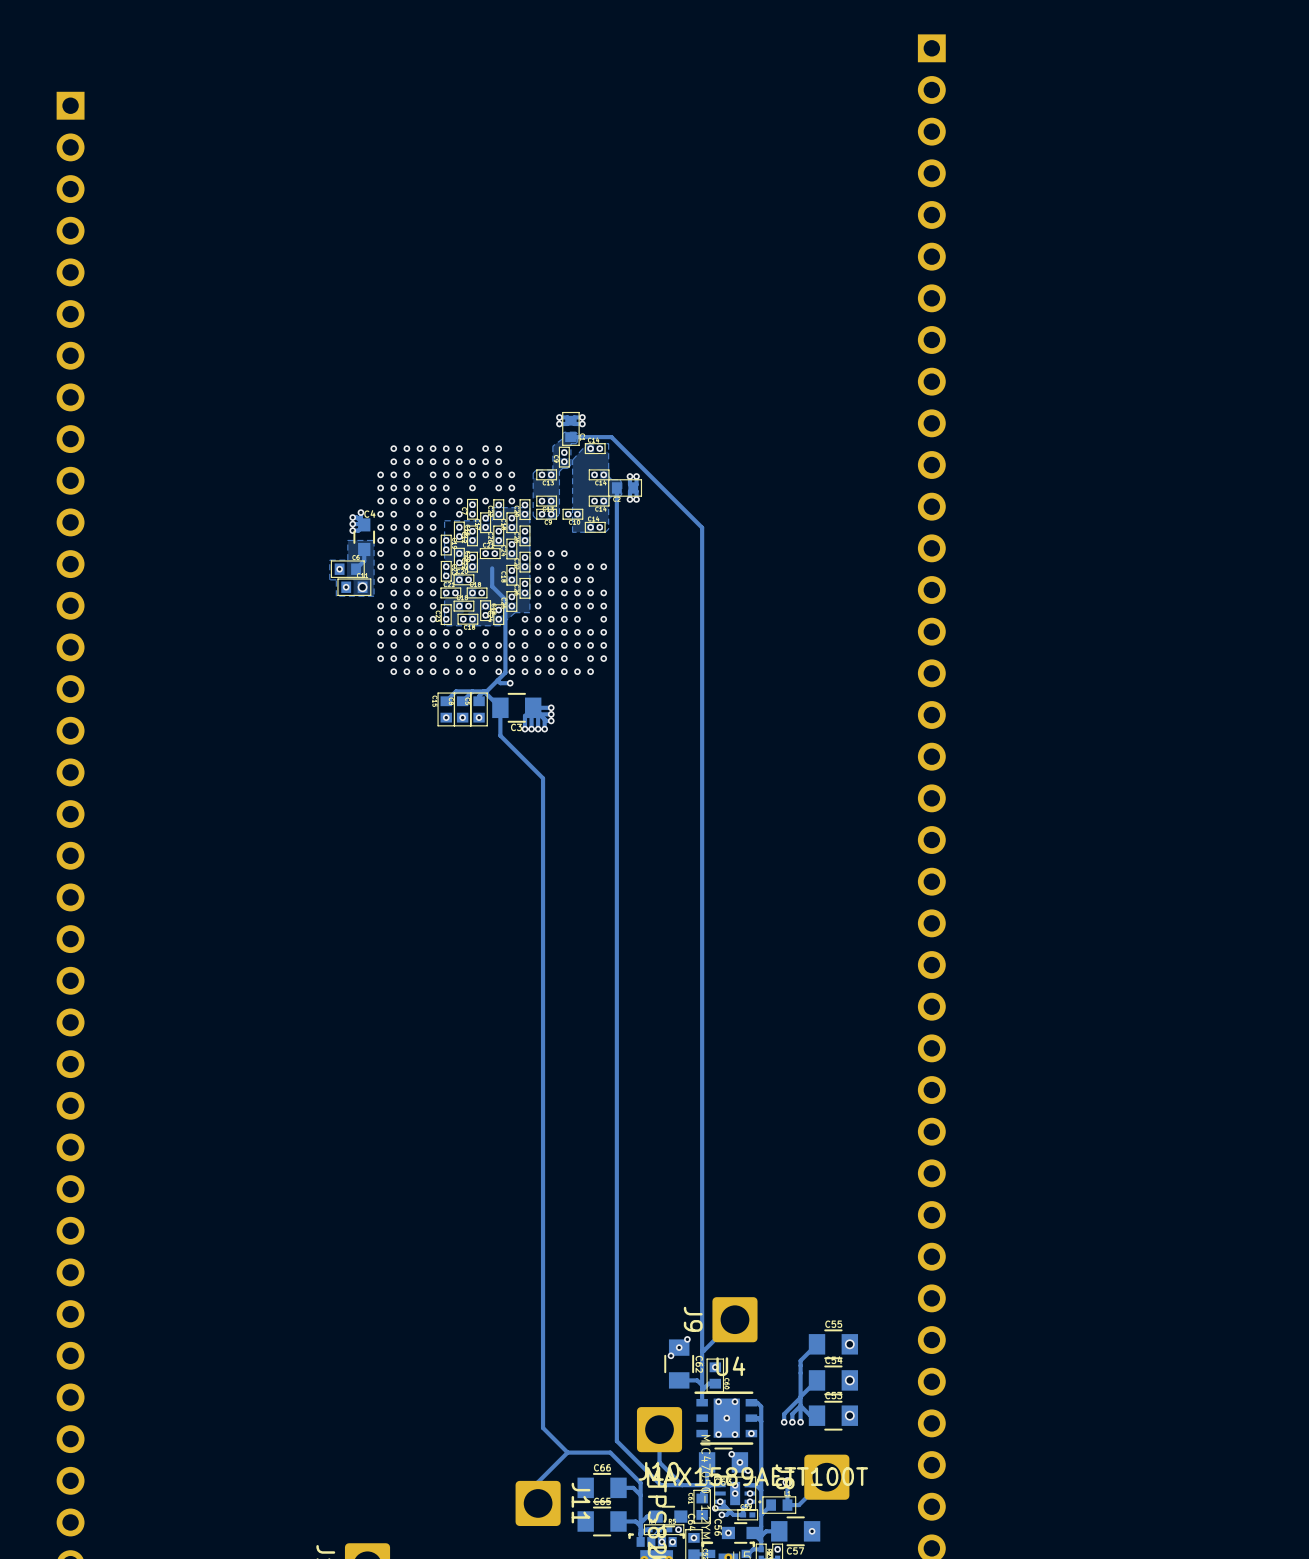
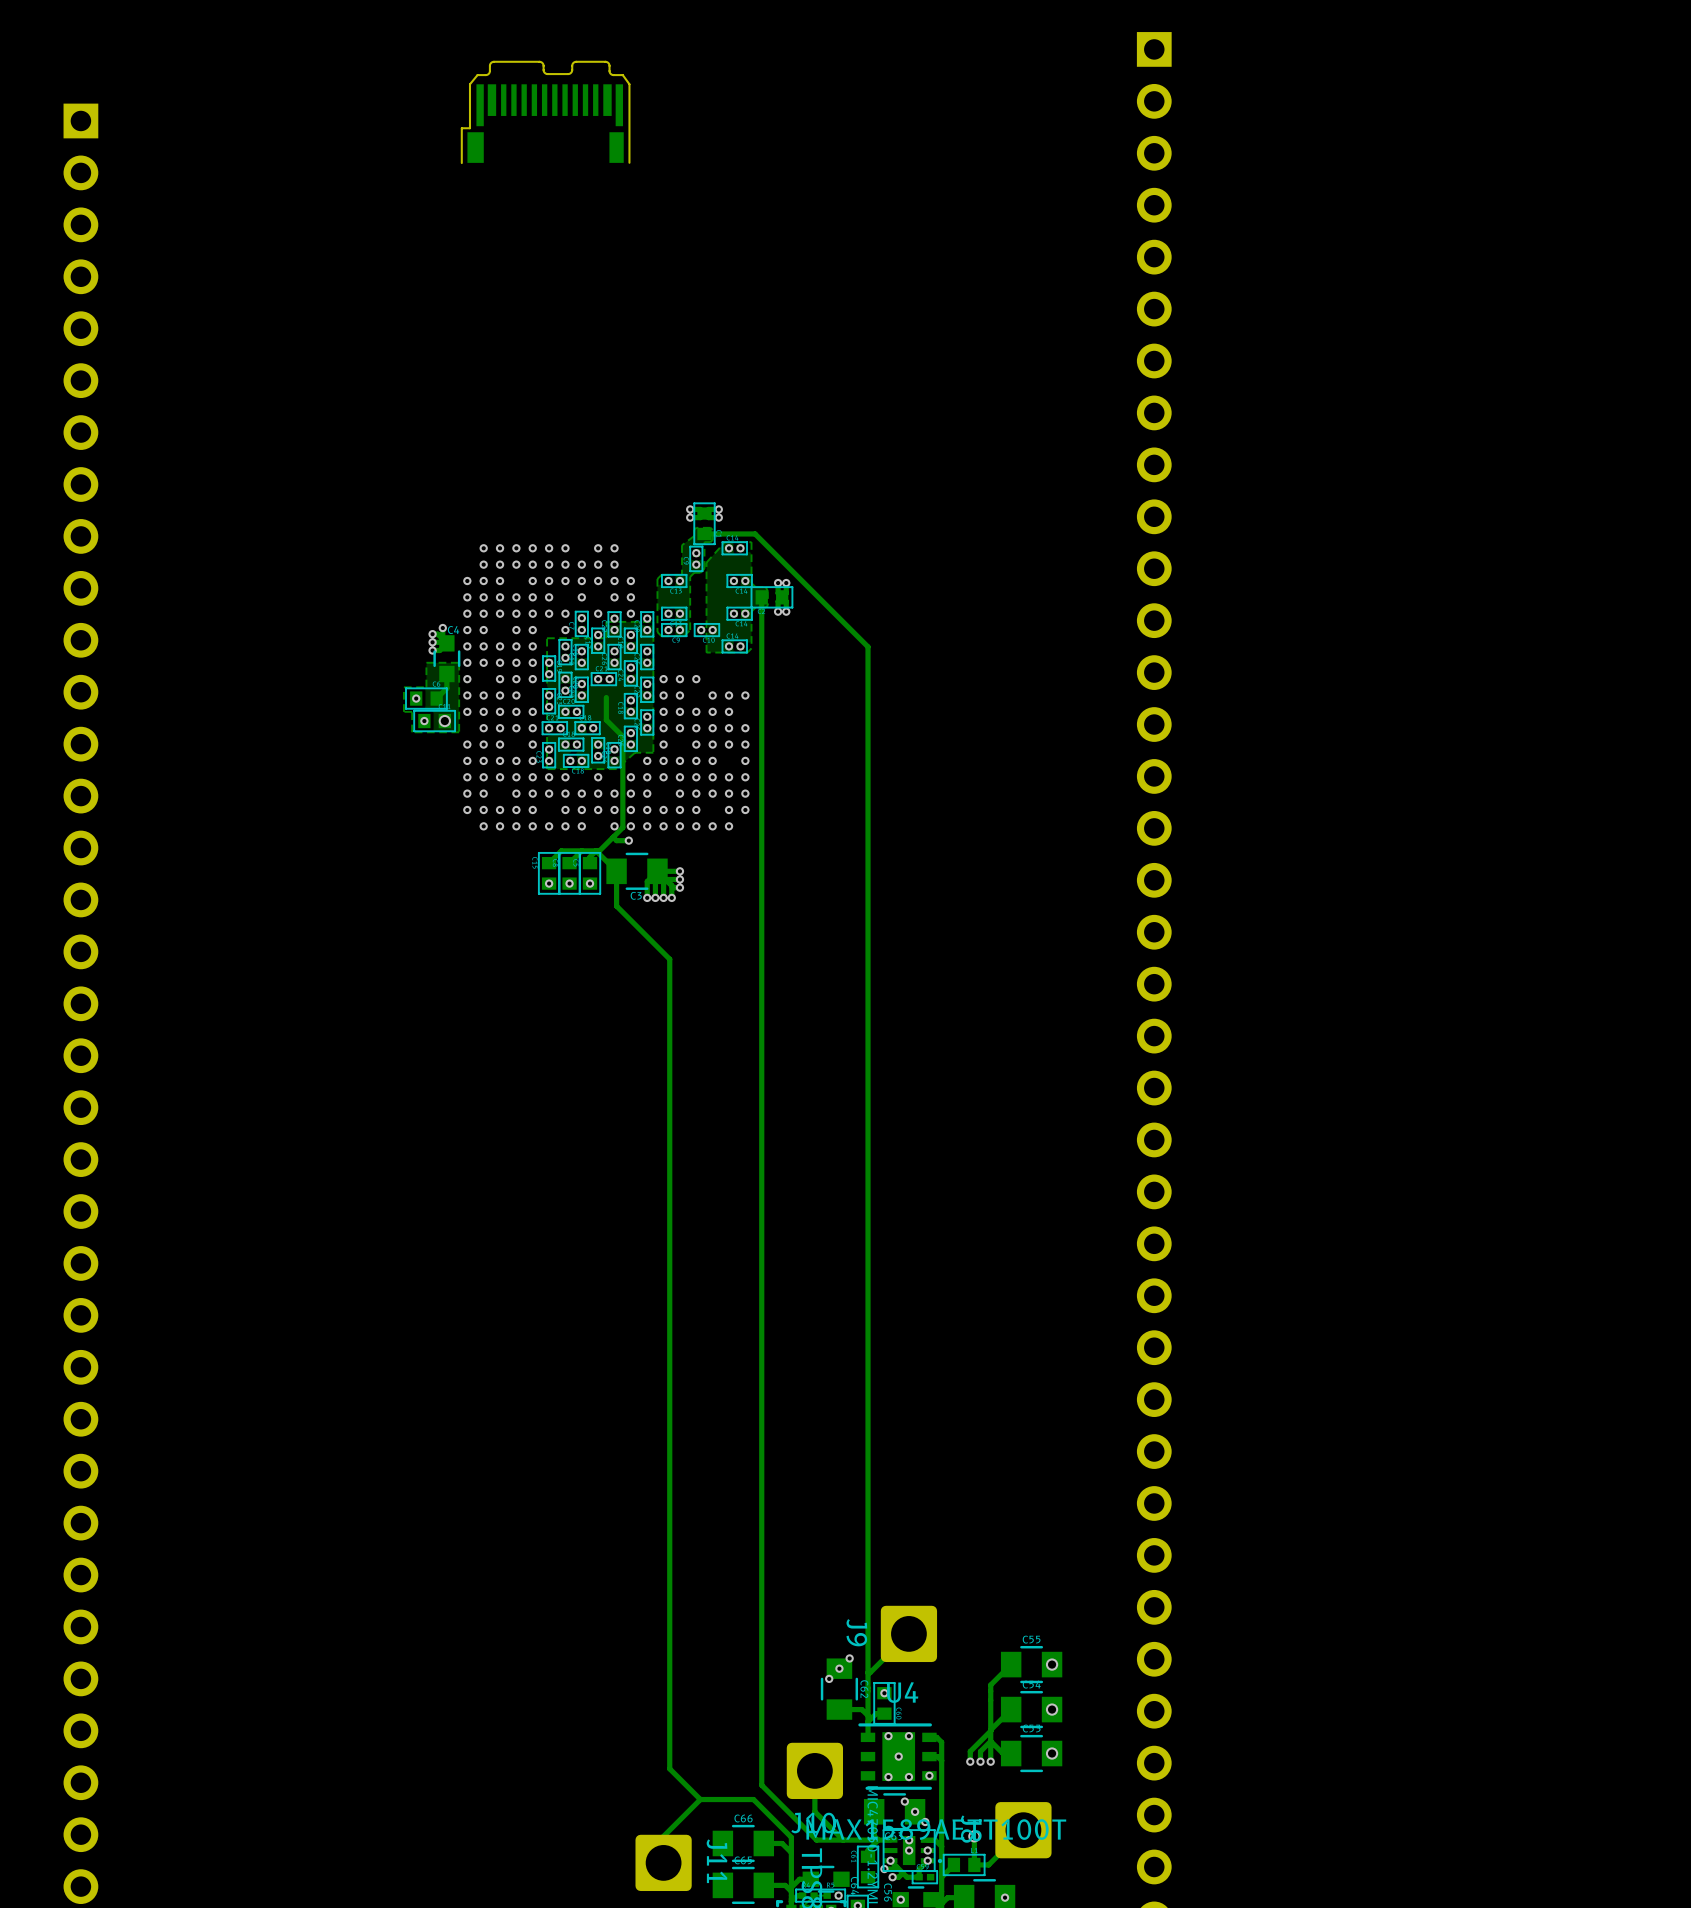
part: none -> (545, 112)

